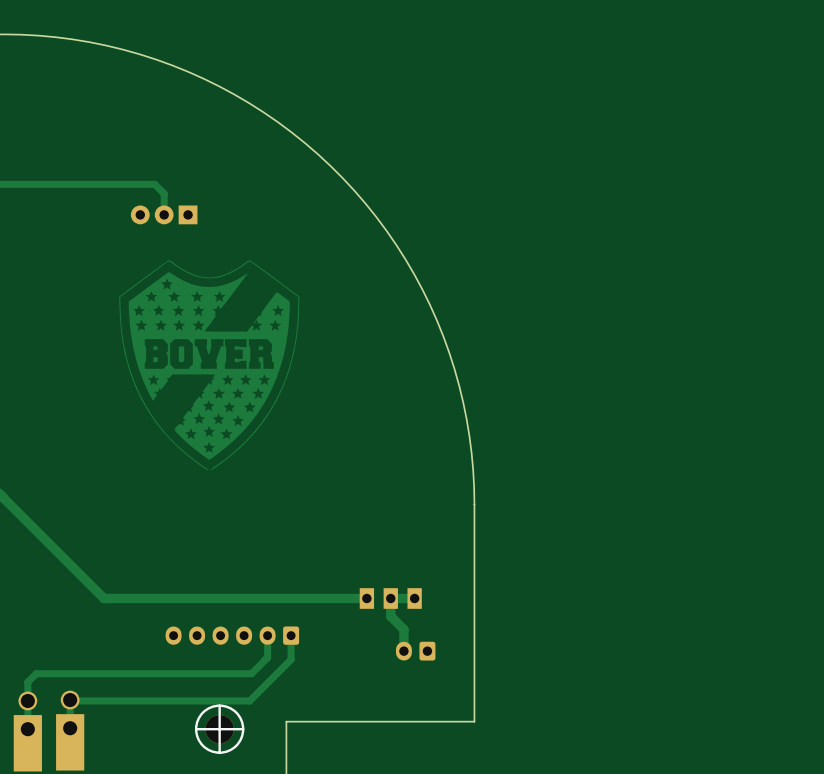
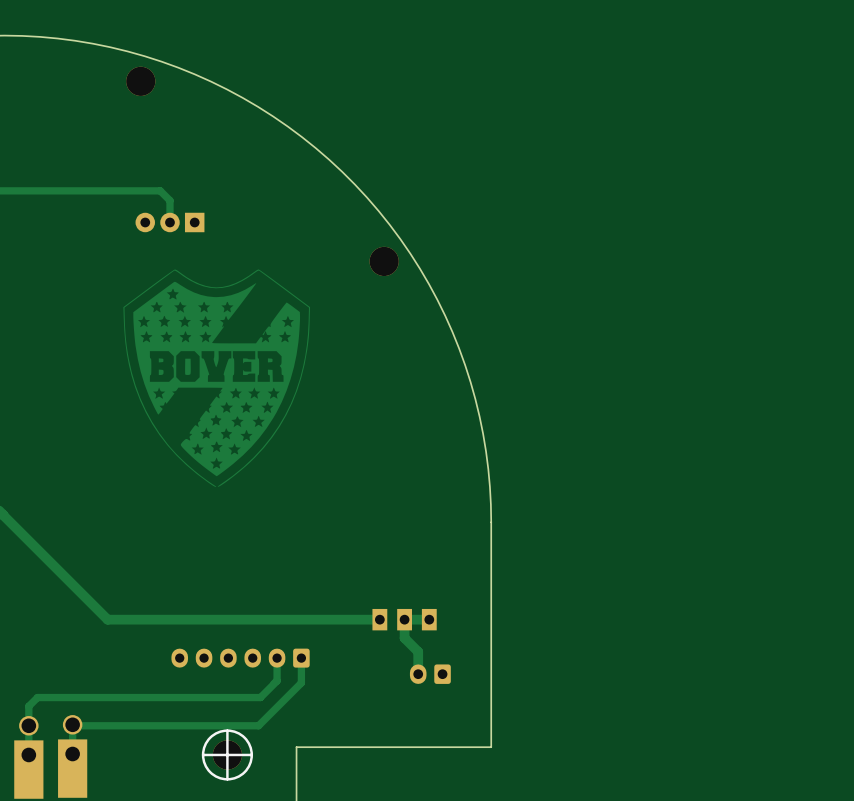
part: none -> (140, 81)
part: none -> (384, 261)

